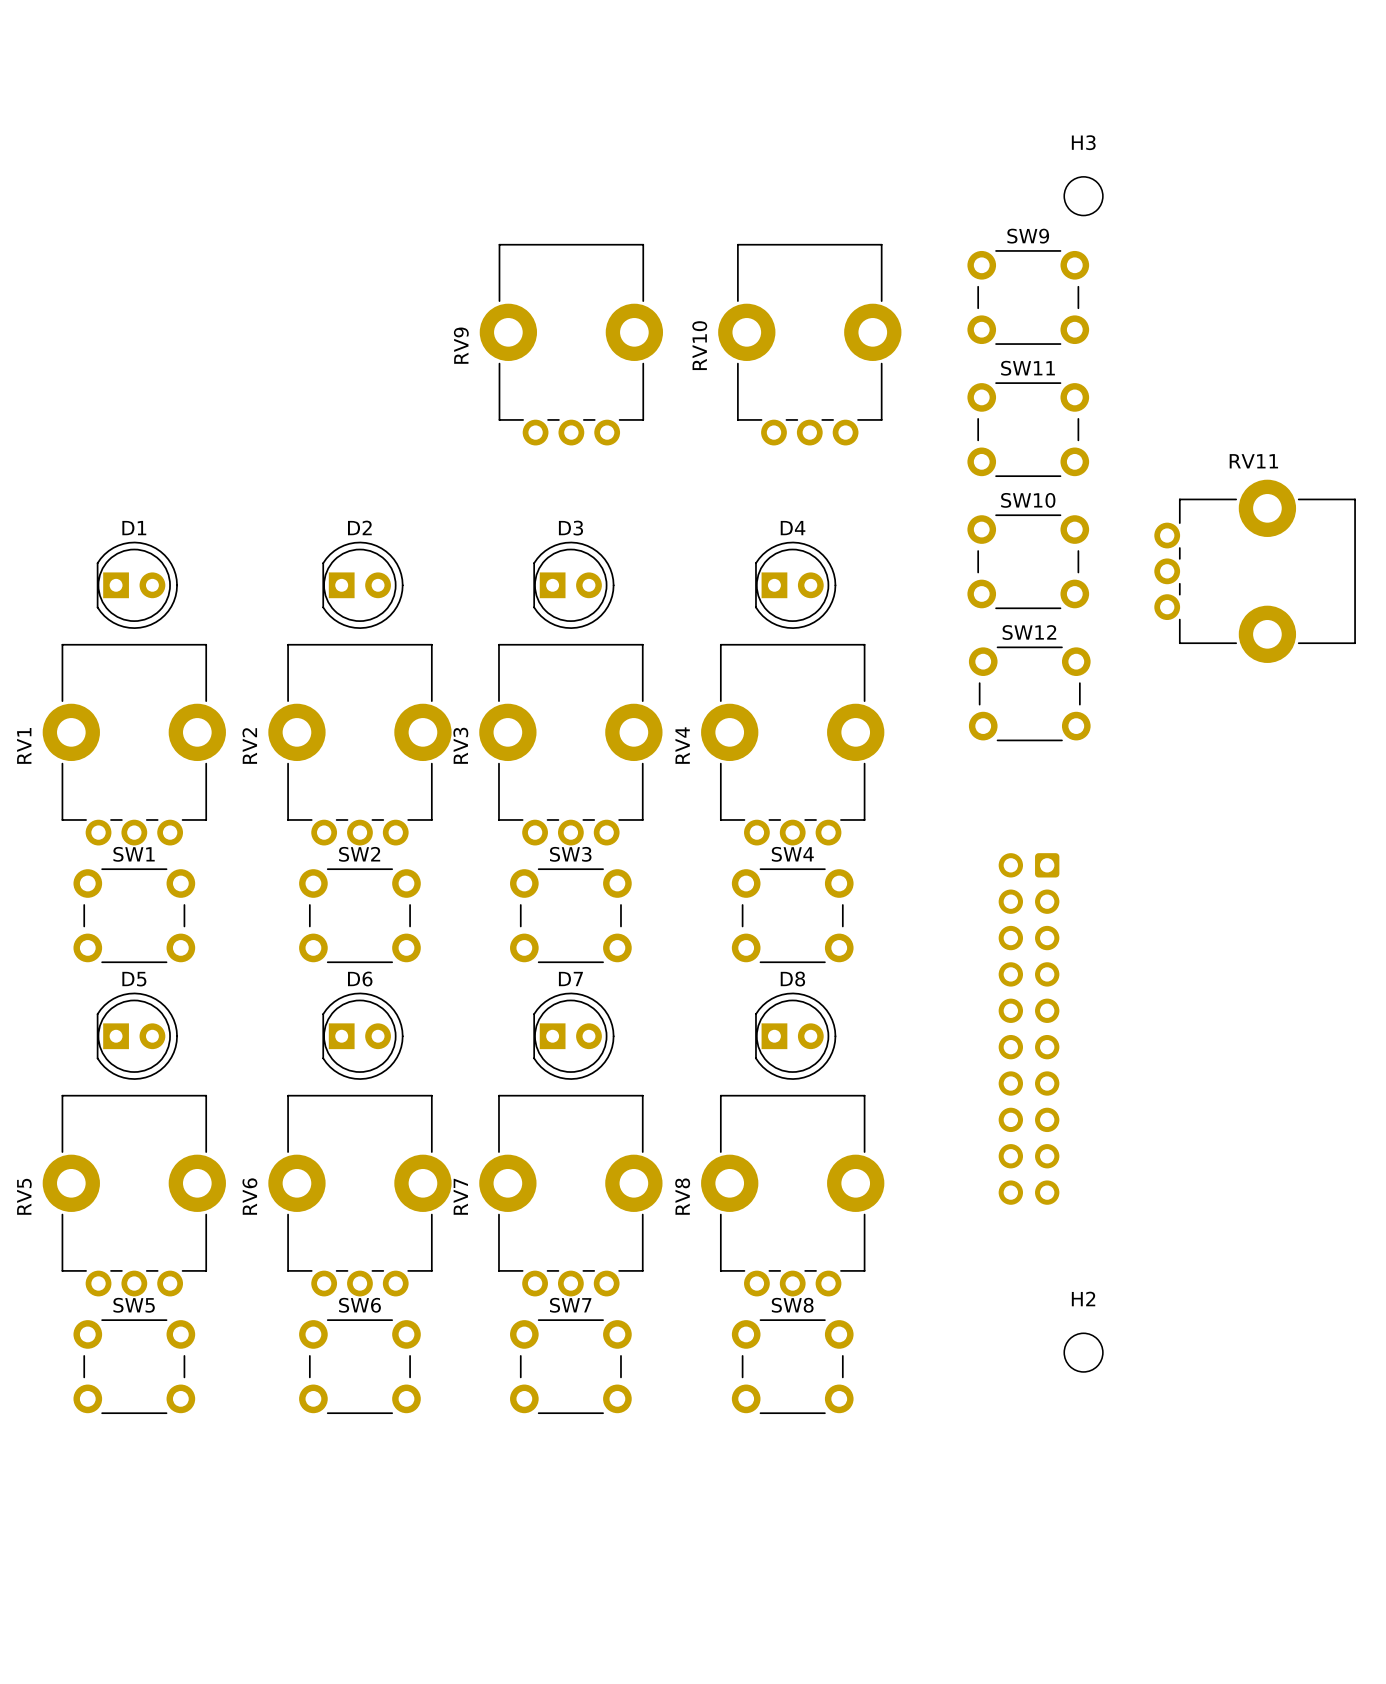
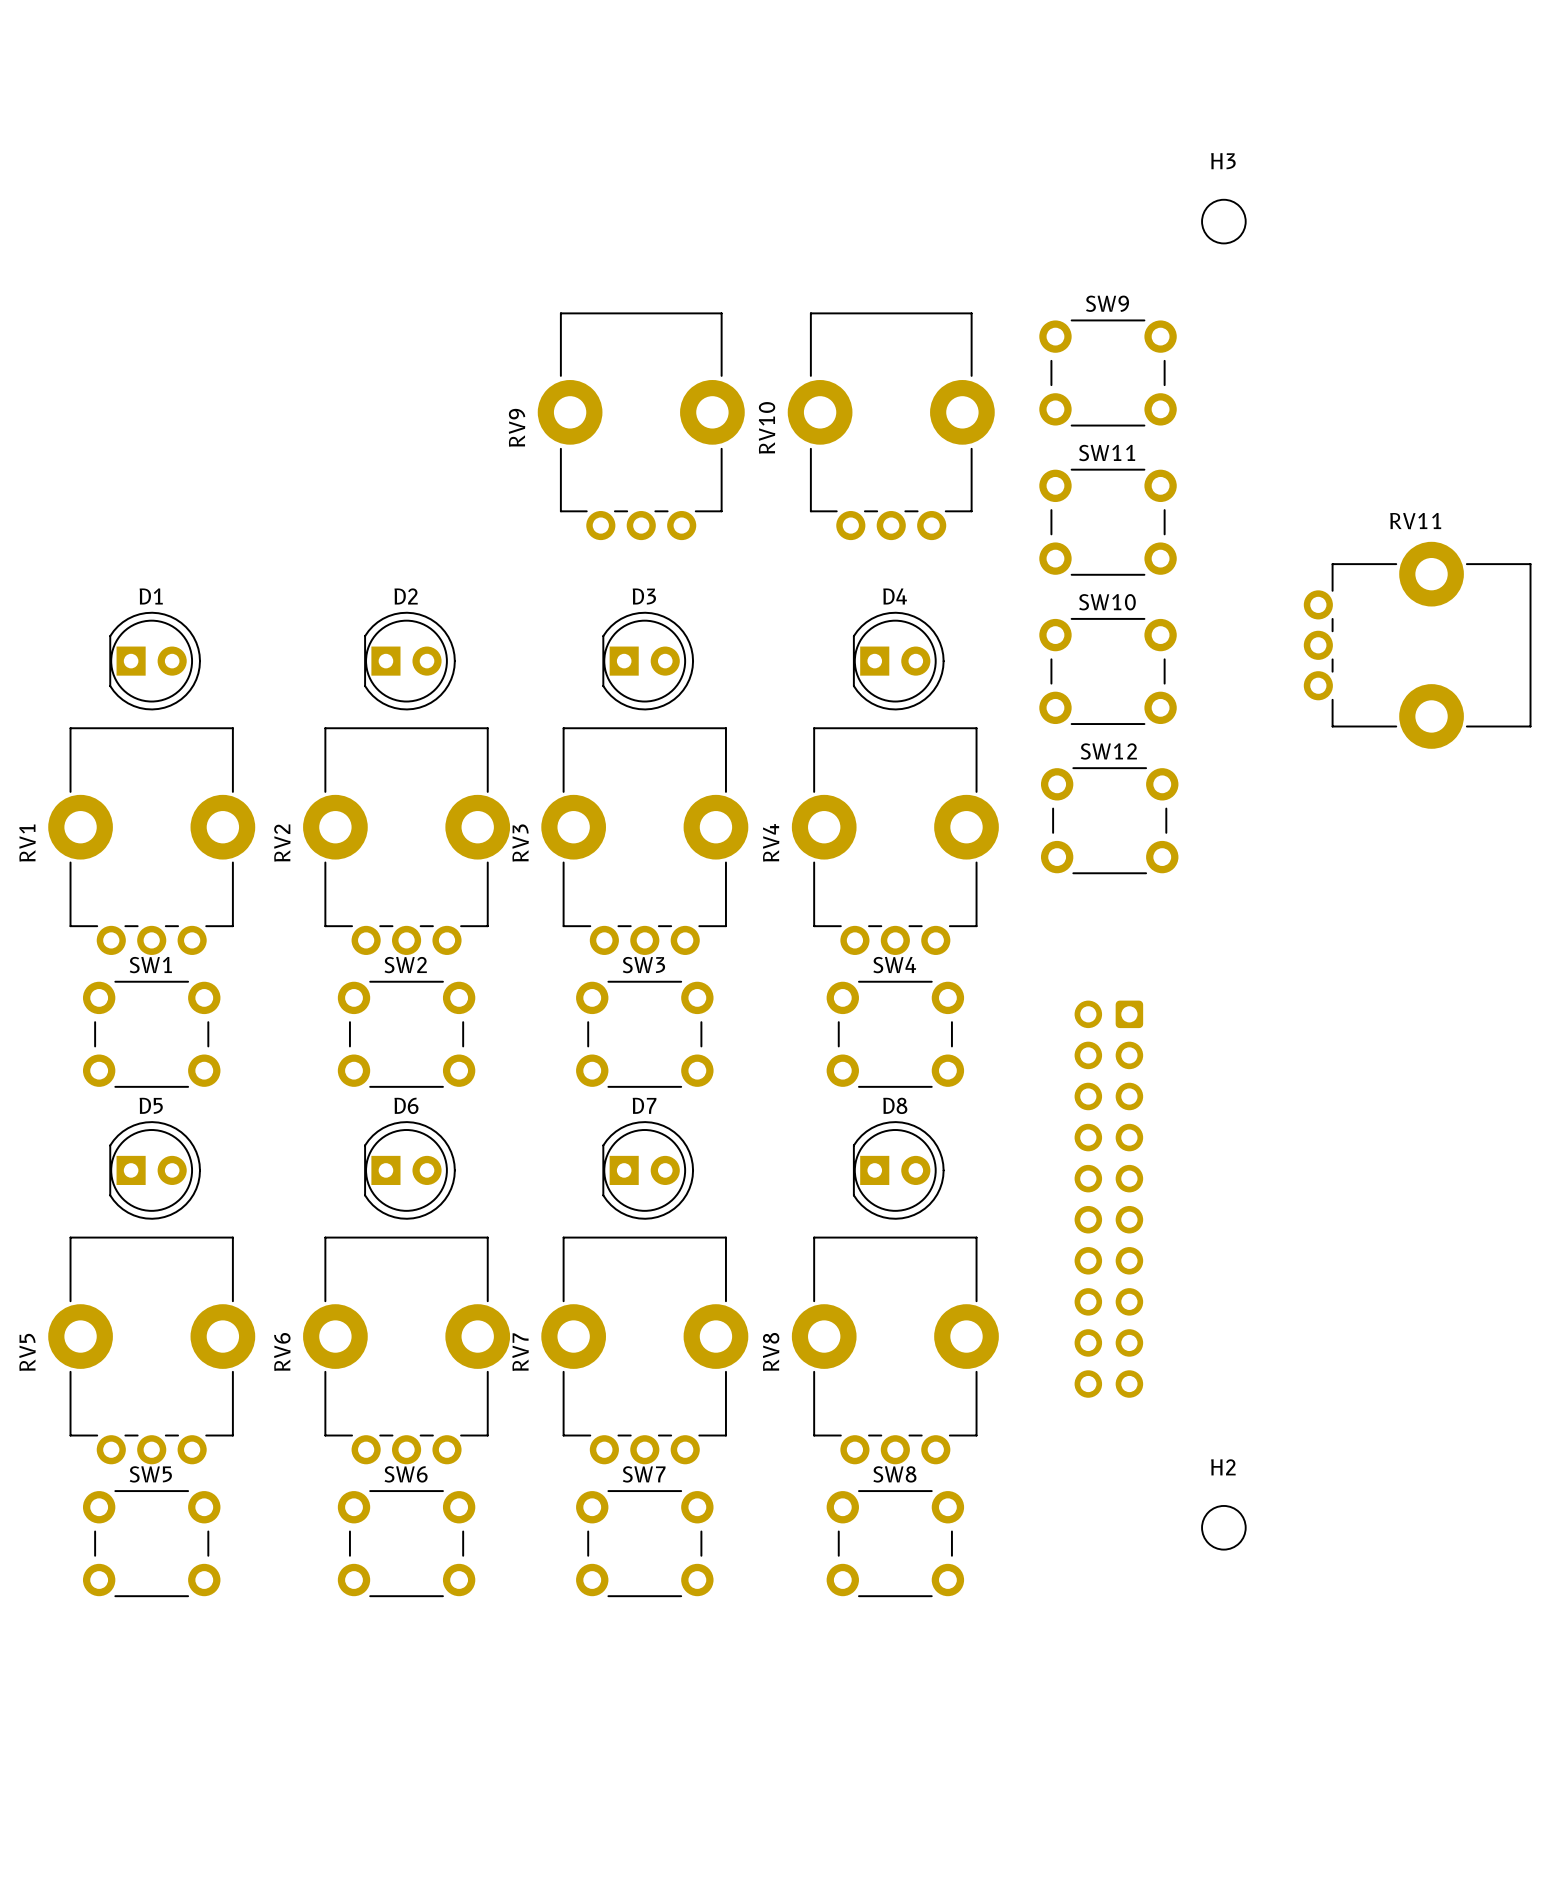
RV9 footprint: [479, 243, 664, 446] -> [537, 312, 745, 541]
RV10 footprint: [718, 243, 902, 446] -> [787, 312, 995, 541]
SW9 position: (1028, 297) -> (1108, 372)
SW11 position: (1028, 429) -> (1108, 522)
SW10 position: (1028, 561) -> (1108, 671)
SW12 position: (1029, 693) -> (1109, 820)
part position: (1029, 1028) -> (1108, 1199)

